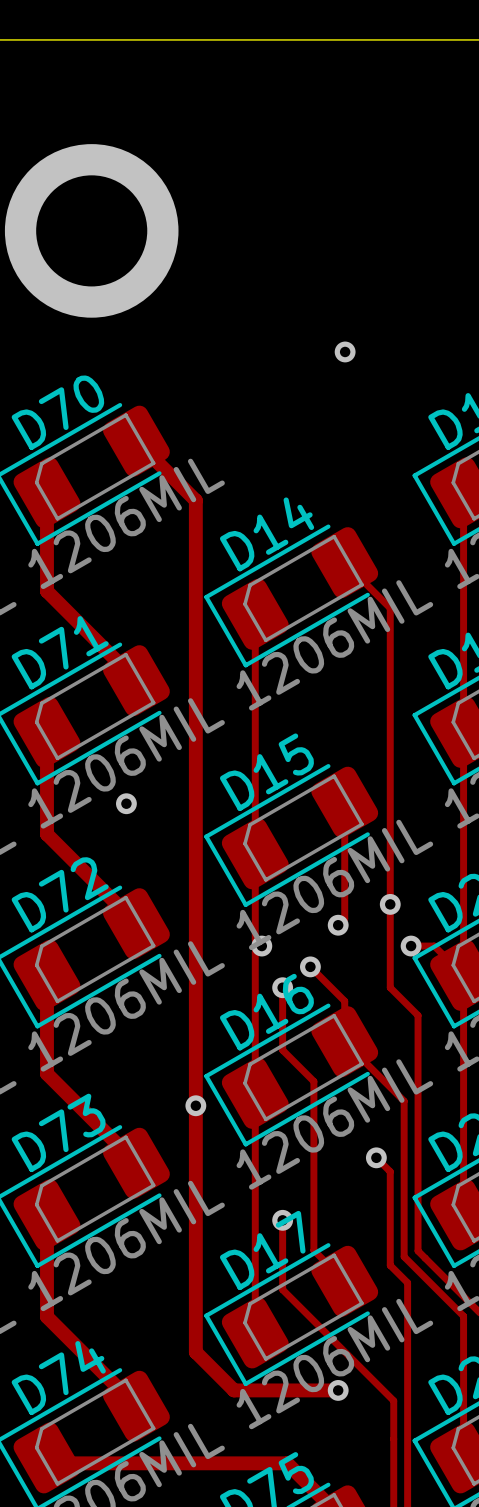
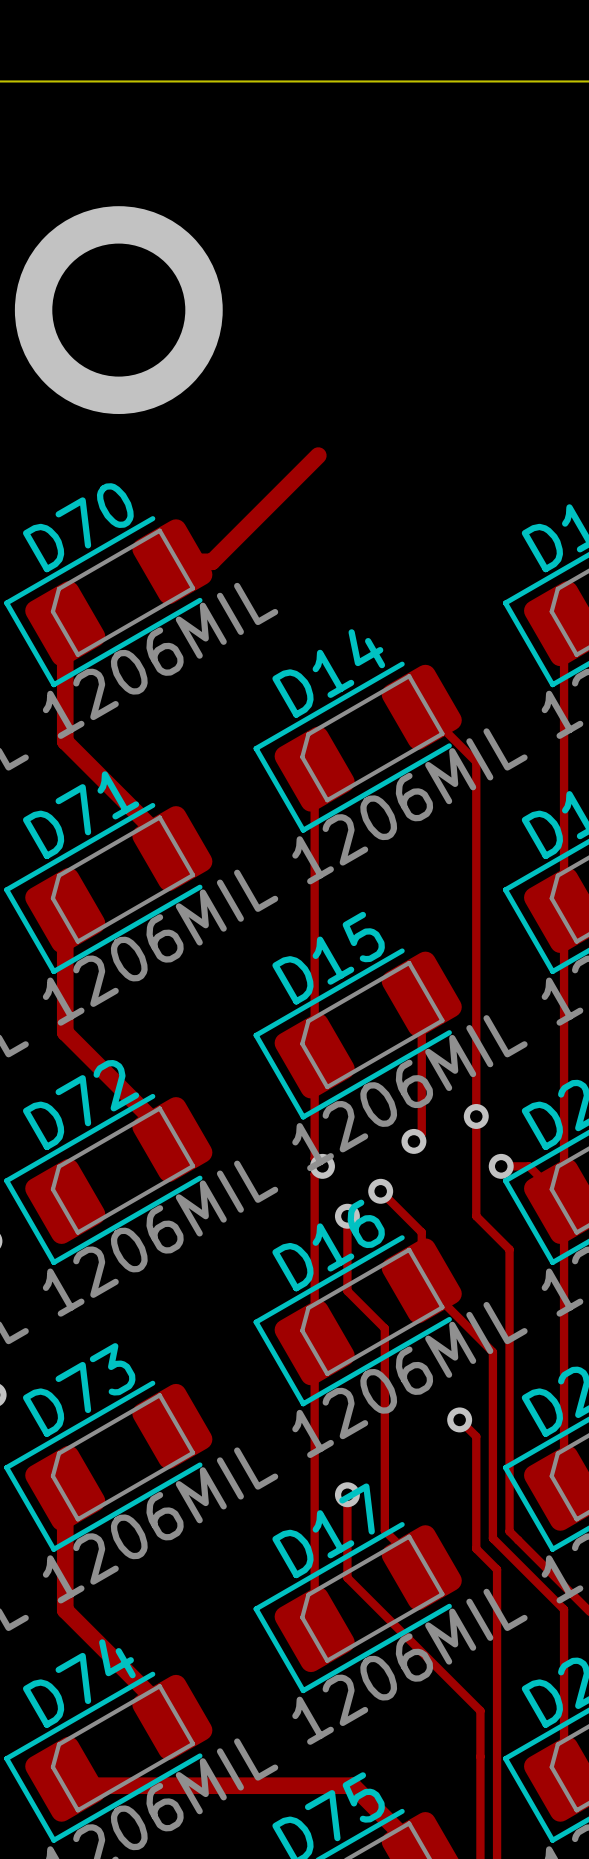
via: (345, 351) -> none
track: (136, 441) (195, 500) (195, 1352) (234, 1390) (338, 1390) -> (172, 561) (212, 561) (318, 455)
via: (126, 803) -> none
track: (46, 975) (46, 1073) (136, 1163) -> none
via: (195, 1105) -> none
via: (338, 1390) -> none

